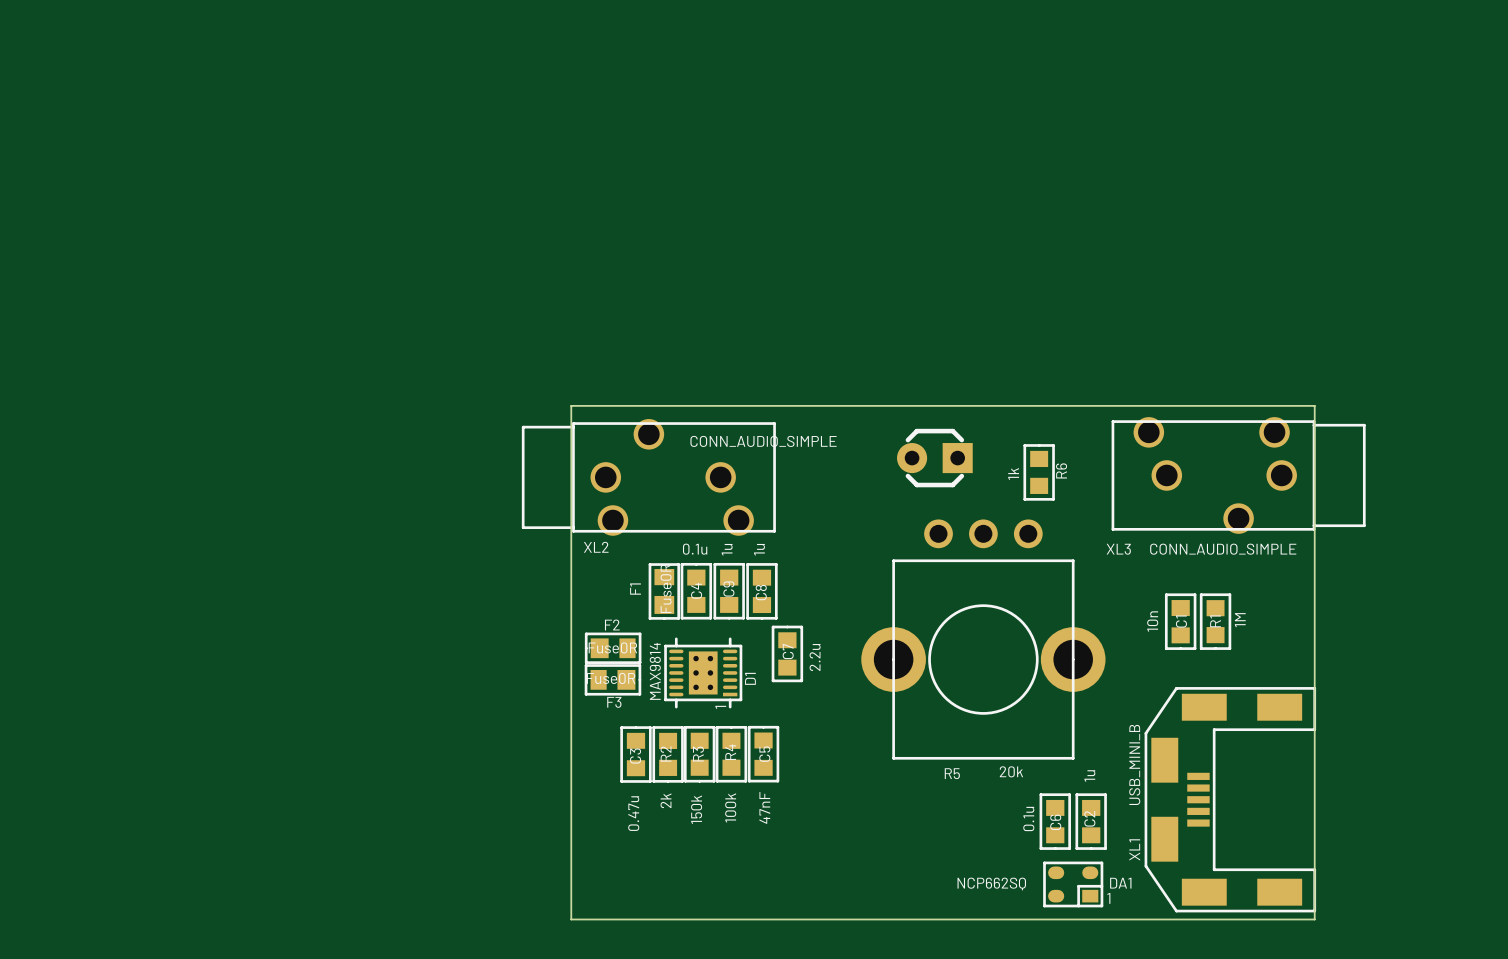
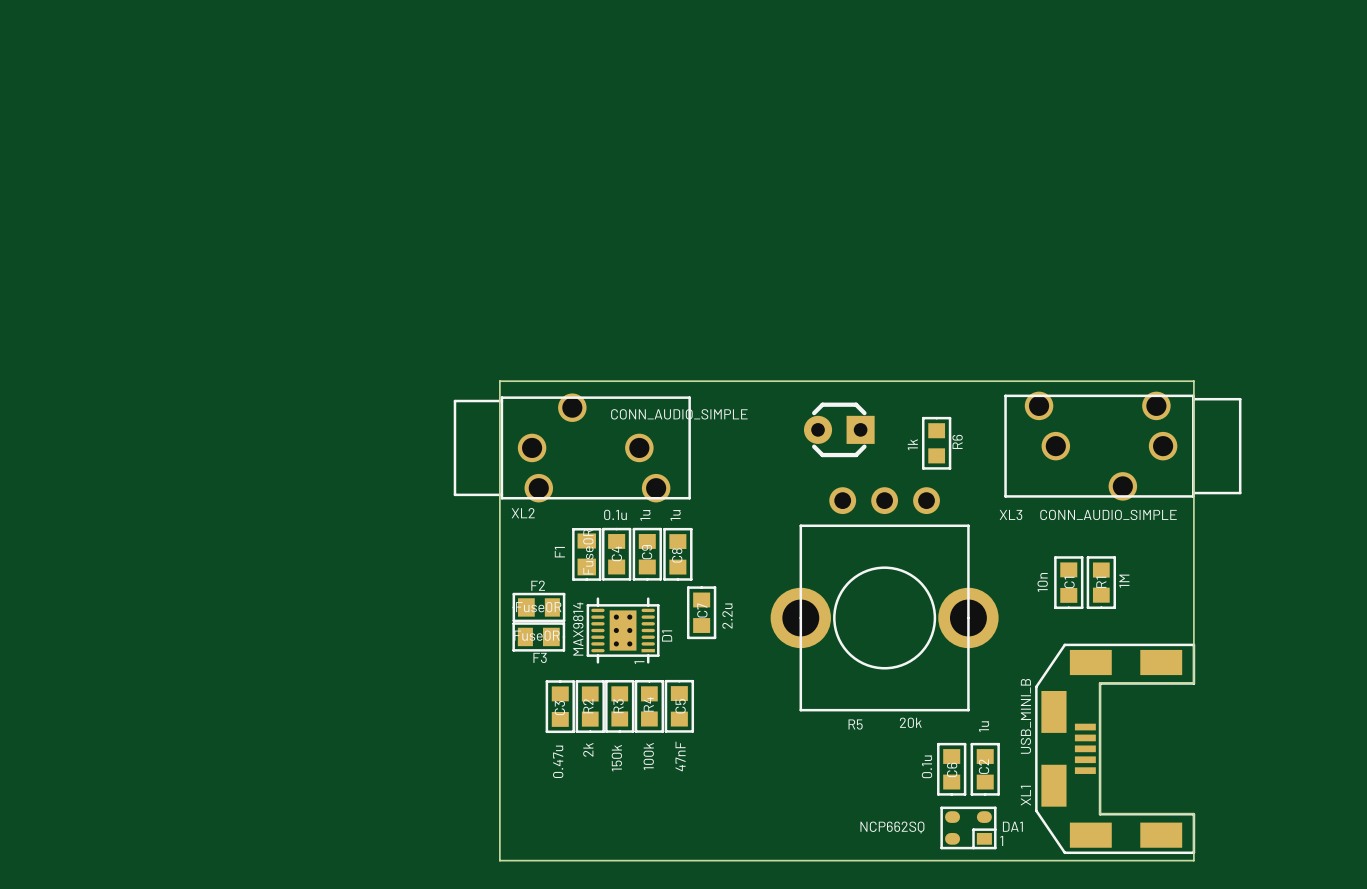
board edge: (1314, 729) (1314, 869) -> (1193, 682) (1100, 682) (1100, 813) (1193, 813)

